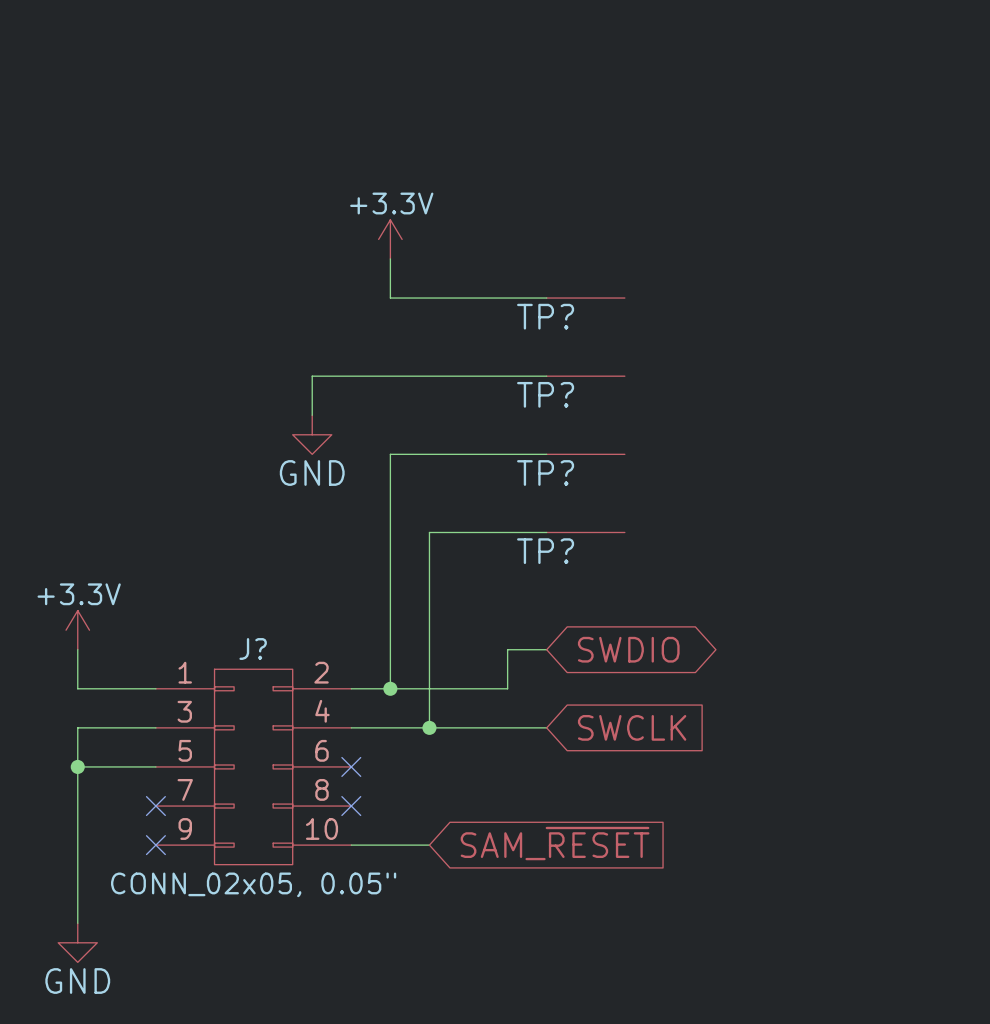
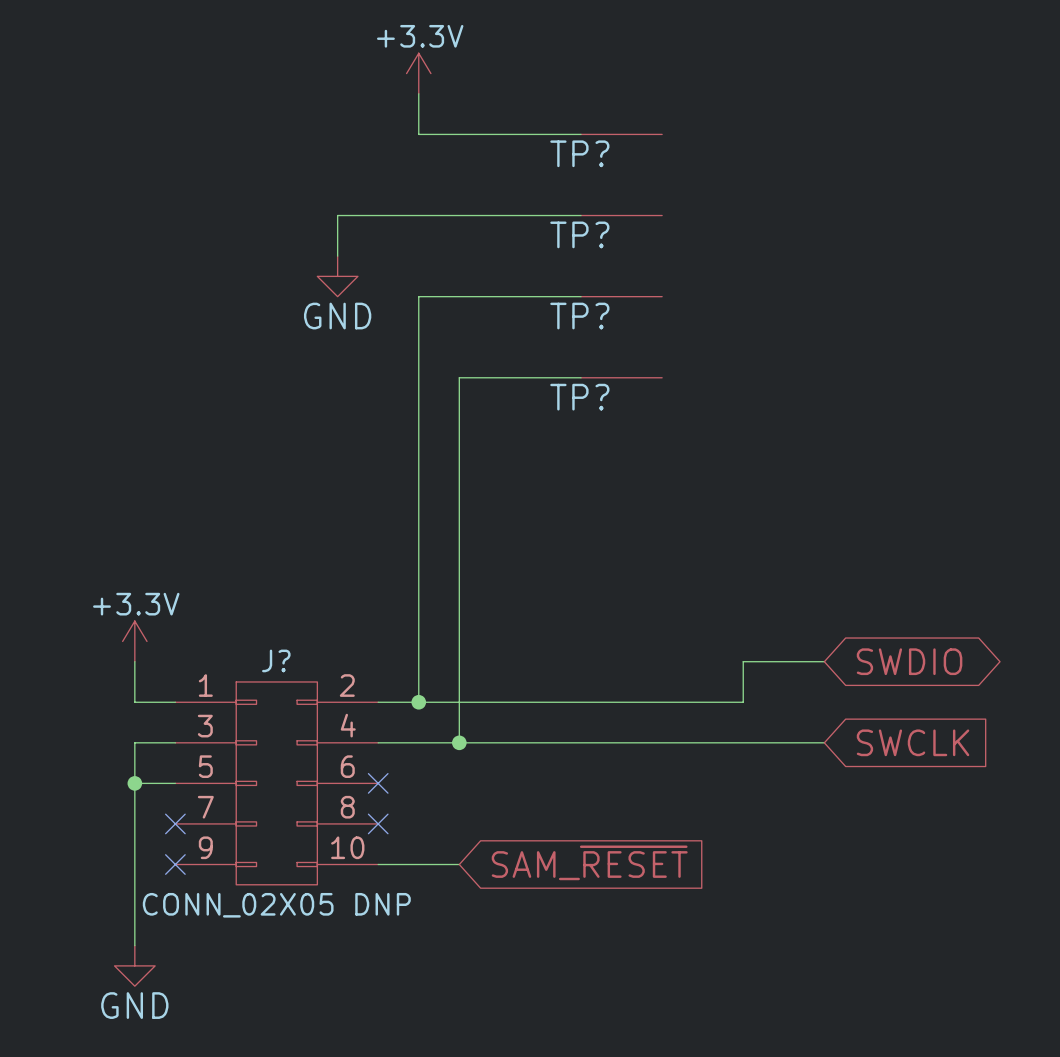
wire: none -> (418, 93) (418, 134) (581, 134)
TP?: none -> (621, 134)
wire: none -> (581, 215) (337, 215) (337, 256)
TP?: none -> (621, 215)
power symbol position: +3.3V (390, 239) -> +3.3V (418, 73)
wire: (390, 258) (390, 298) -> (418, 458) (418, 296)
wire: (429, 376) (312, 376) (312, 415) -> (459, 377) (459, 540)
power symbol position: GND (312, 434) -> GND (337, 276)
wire: (390, 454) (546, 454) -> none
TP?: (585, 454) -> none
wire: (429, 532) (546, 532) -> none
TP?: (585, 532) -> none
power symbol position: +3.3V (77, 630) -> +3.3V (134, 641)
wire: (77, 649) (77, 688) (116, 688) -> (134, 661) (134, 702)
wire: (546, 649) (507, 649) (507, 688) -> (824, 661) (743, 661) (743, 702) (540, 702)
global label position: SWDIO (628, 649) -> SWDIO (909, 661)
wire: (116, 727) (77, 727) (77, 923) -> (134, 742) (134, 945)
wire: none -> (581, 742) (824, 742)
global label position: SWCLK (632, 727) -> SWCLK (913, 742)
wire: (77, 766) (116, 766) -> none
junction position: (77, 766) -> (134, 783)
J? value: CONN_02x05, 0.05" (253, 884) -> CONN_02X05 DNP (276, 905)
power symbol position: GND (77, 942) -> GND (134, 965)

